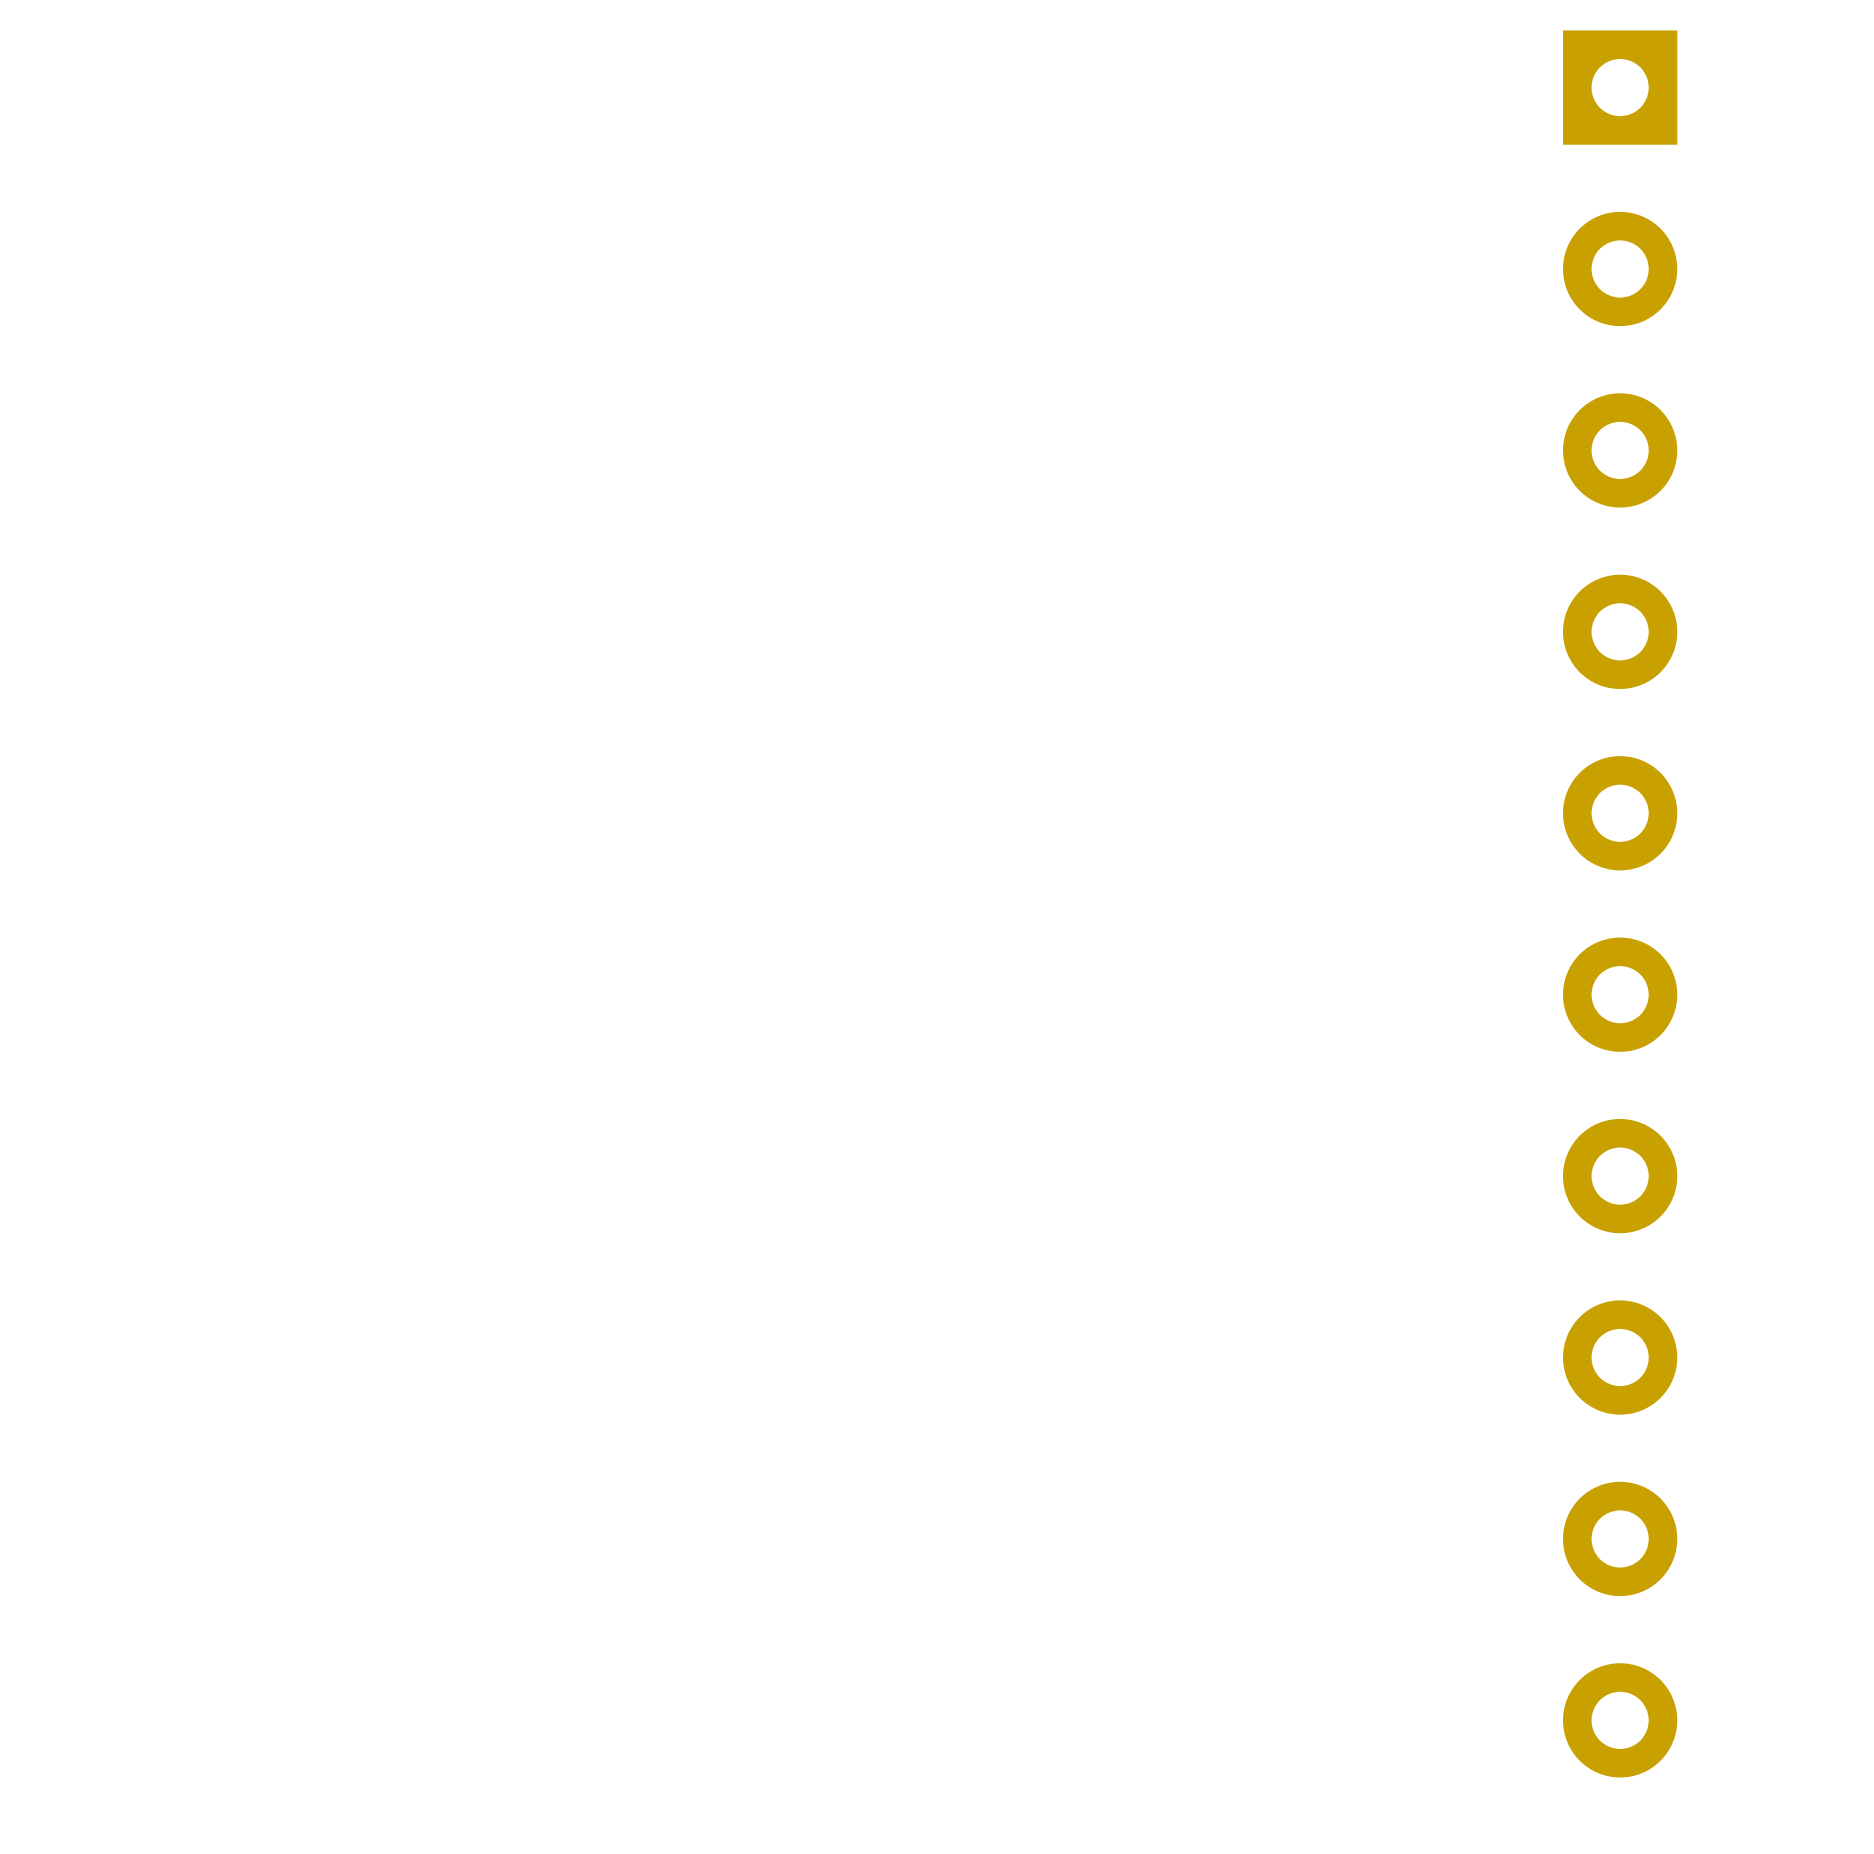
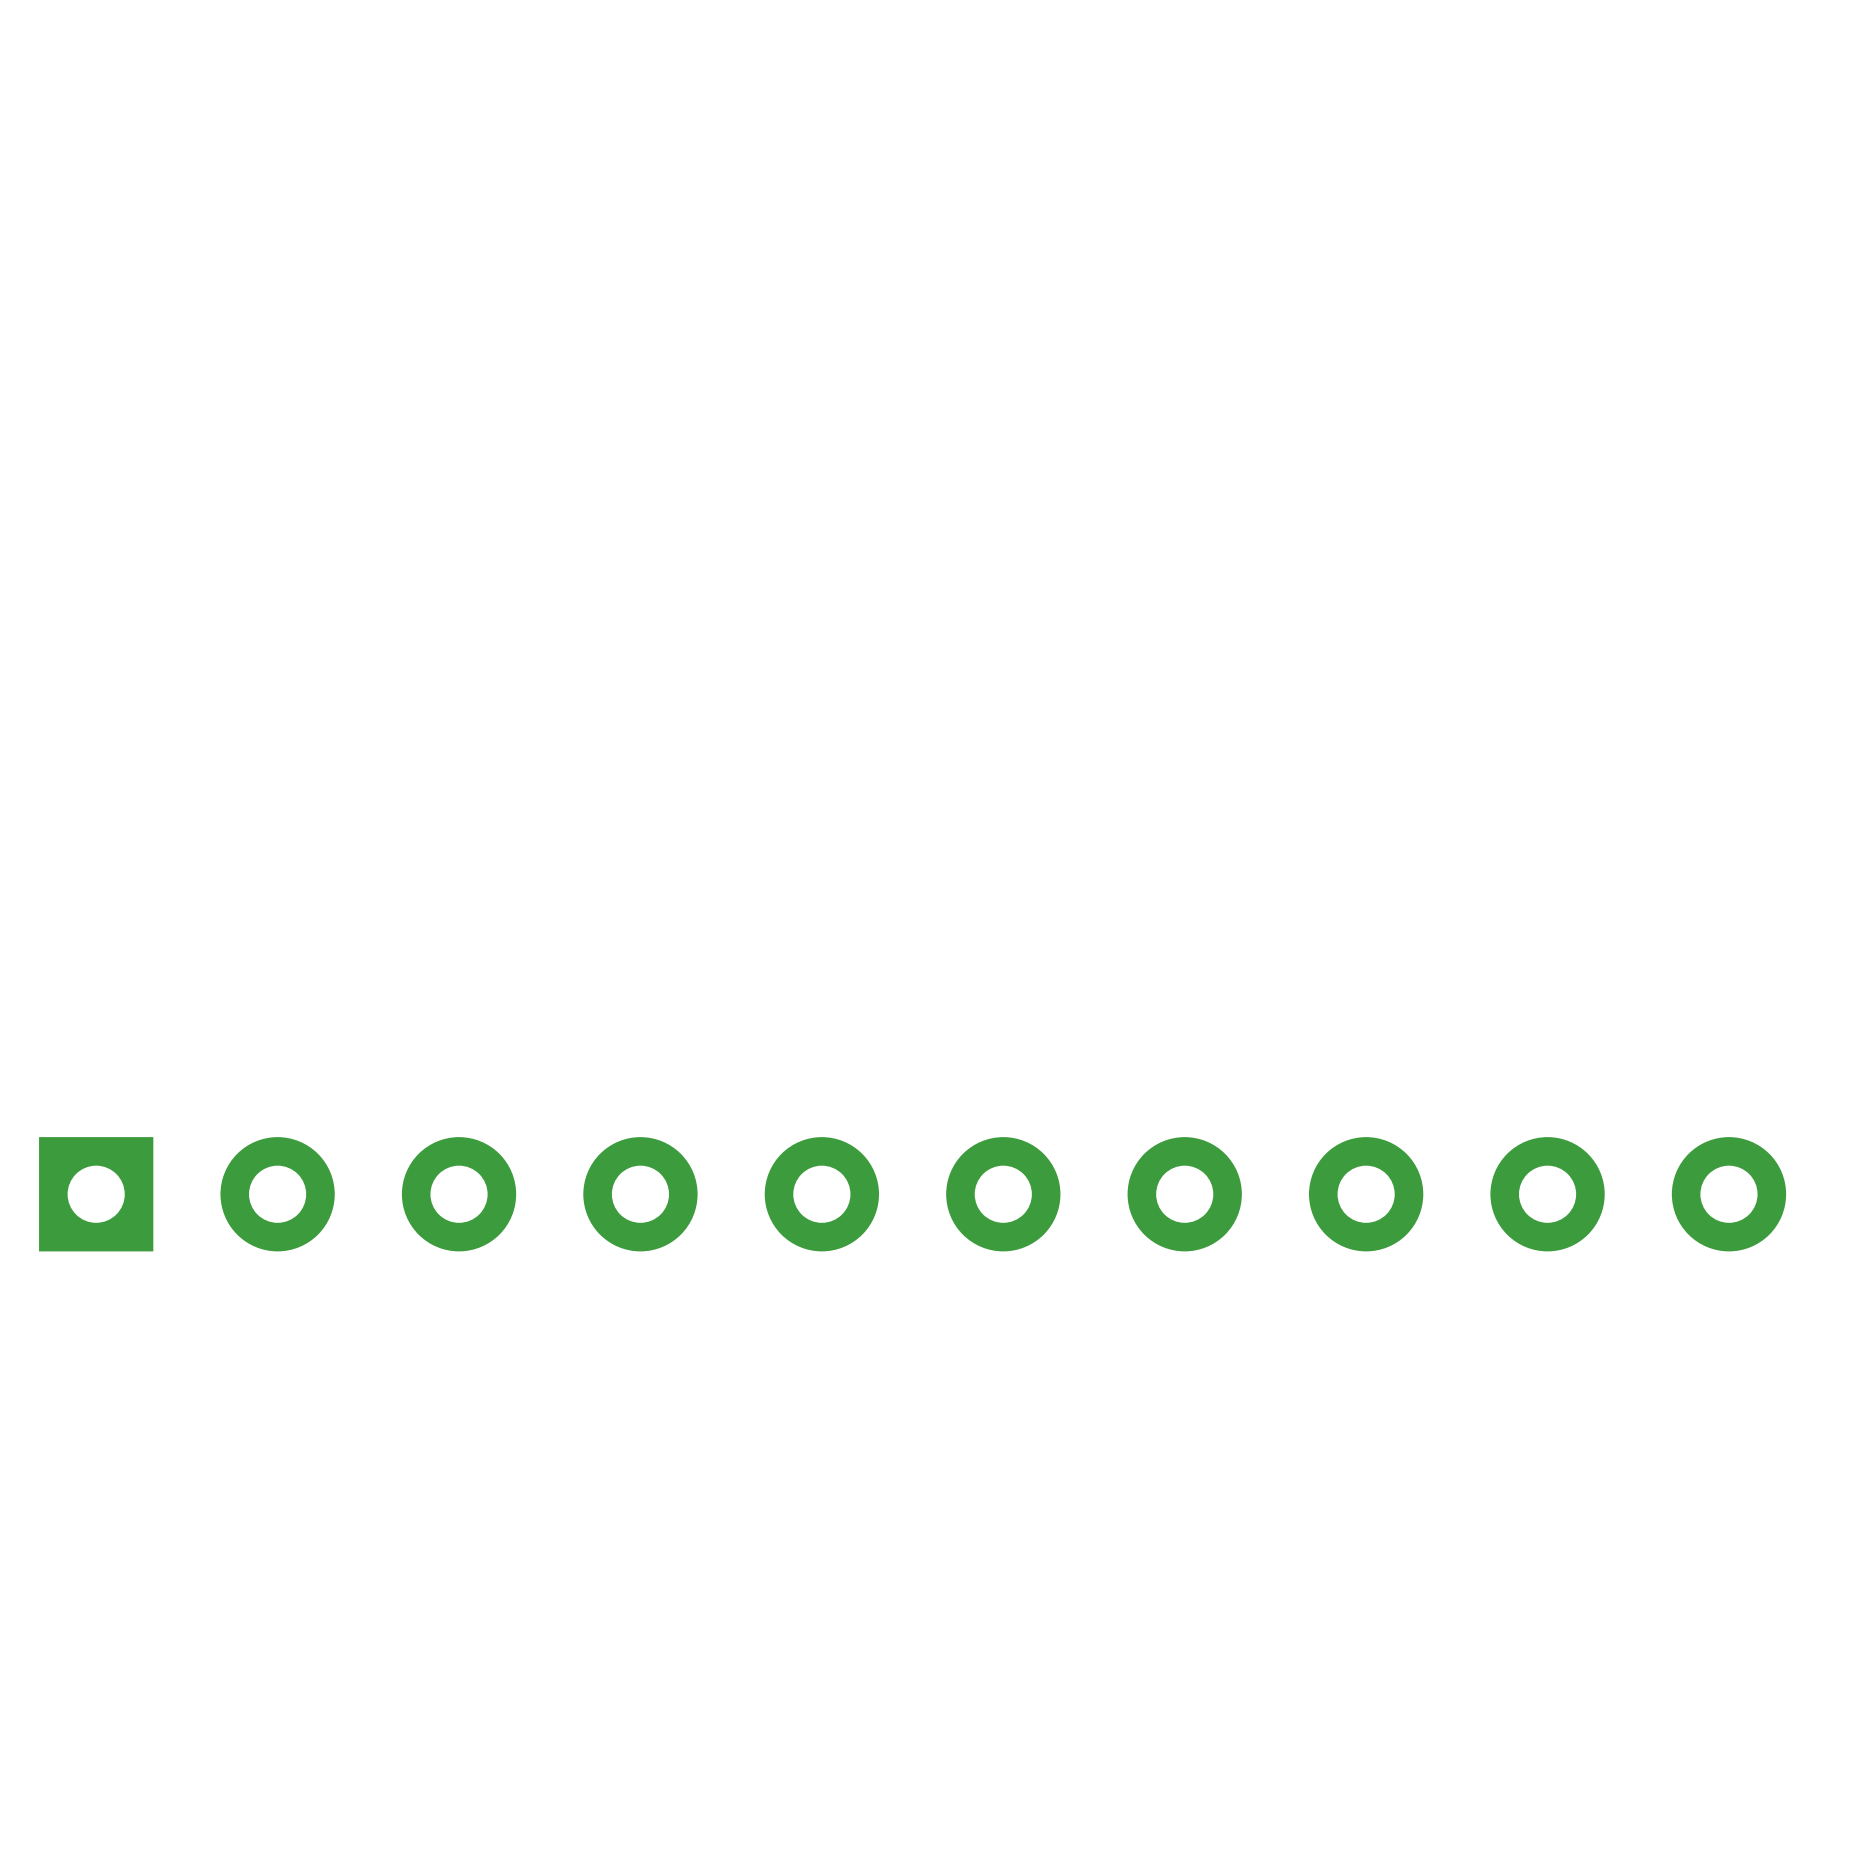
part rotation: 0° (1620, 903) -> 90° counterclockwise (912, 1194)

